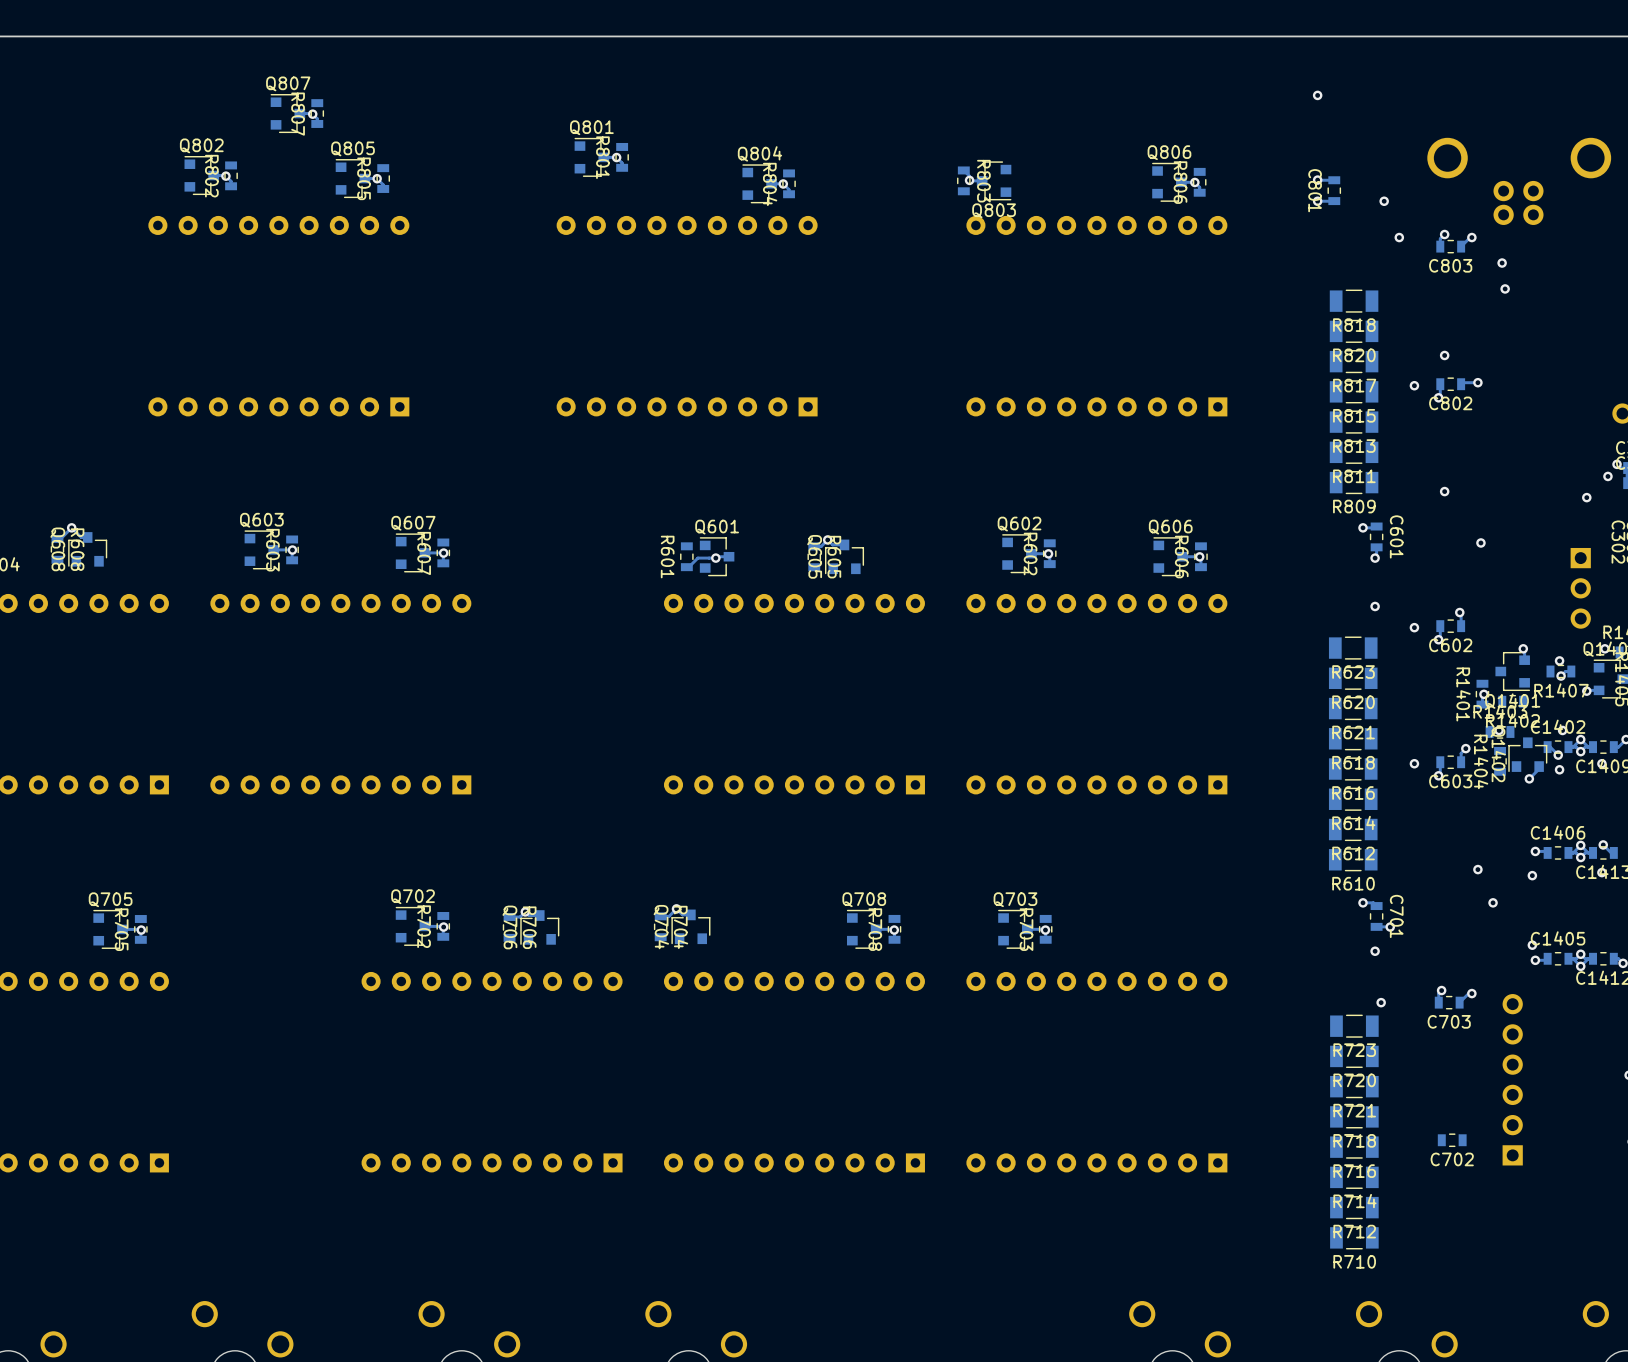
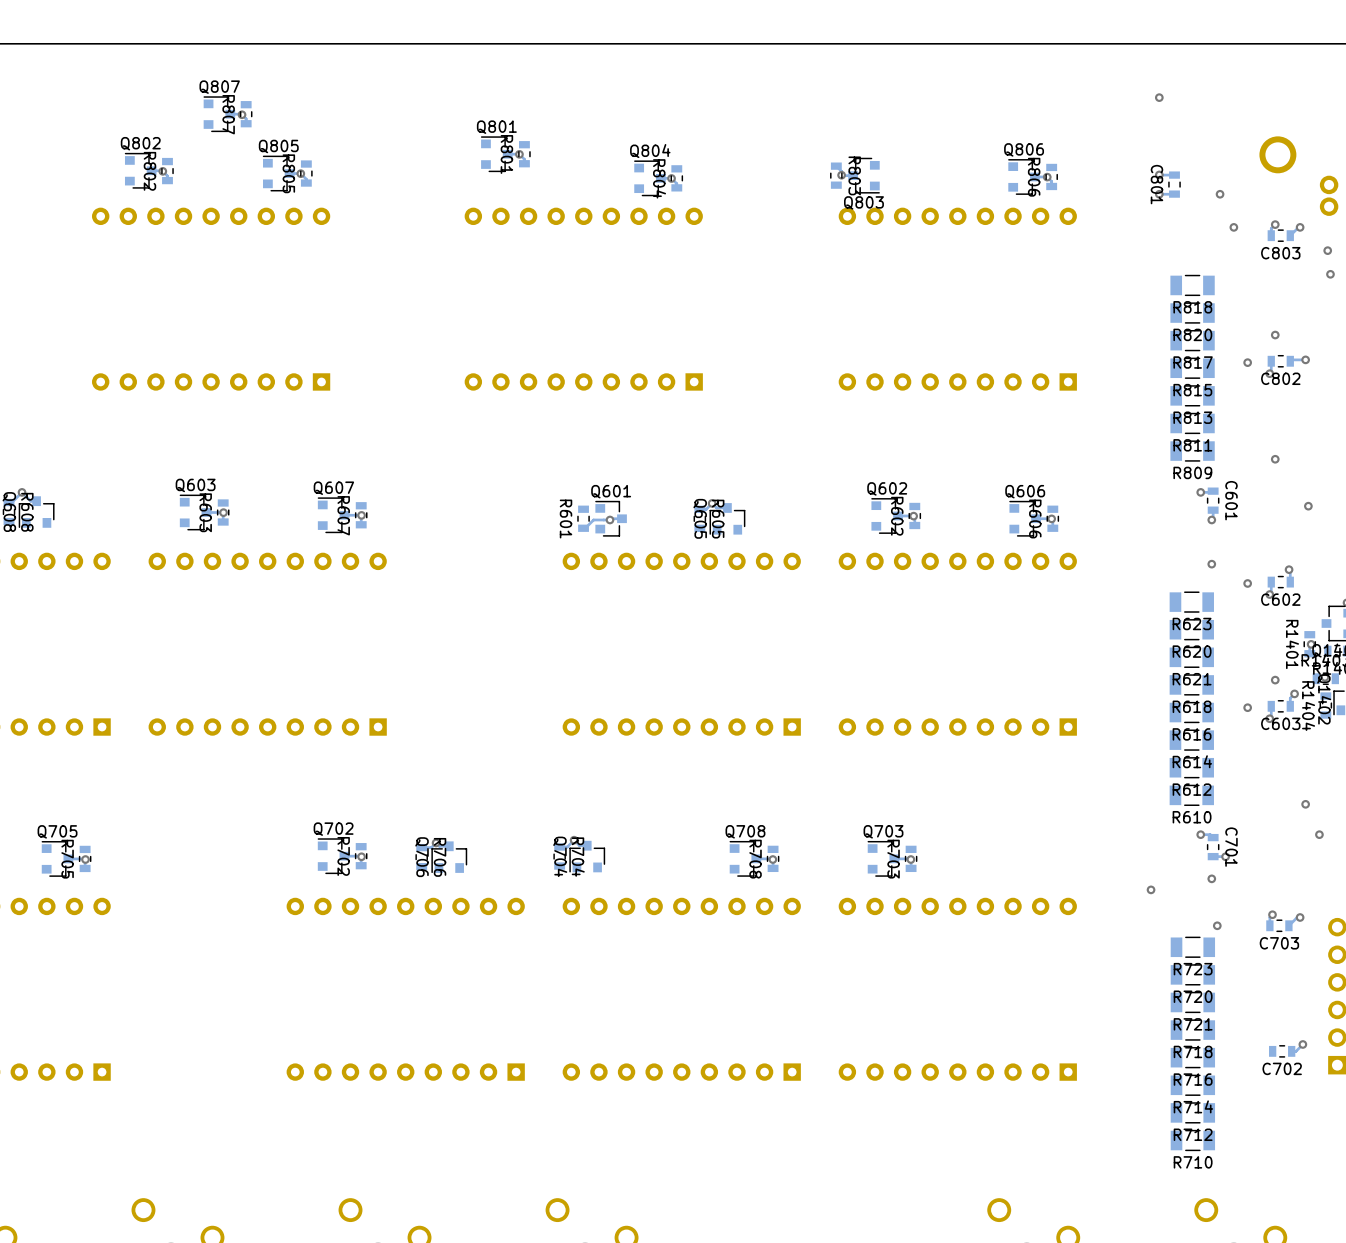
via: none -> (1275, 680)
via: none -> (1151, 889)
track: none -> (1302, 1044) (1295, 1051) (1291, 1051)
via: none -> (1302, 1044)

